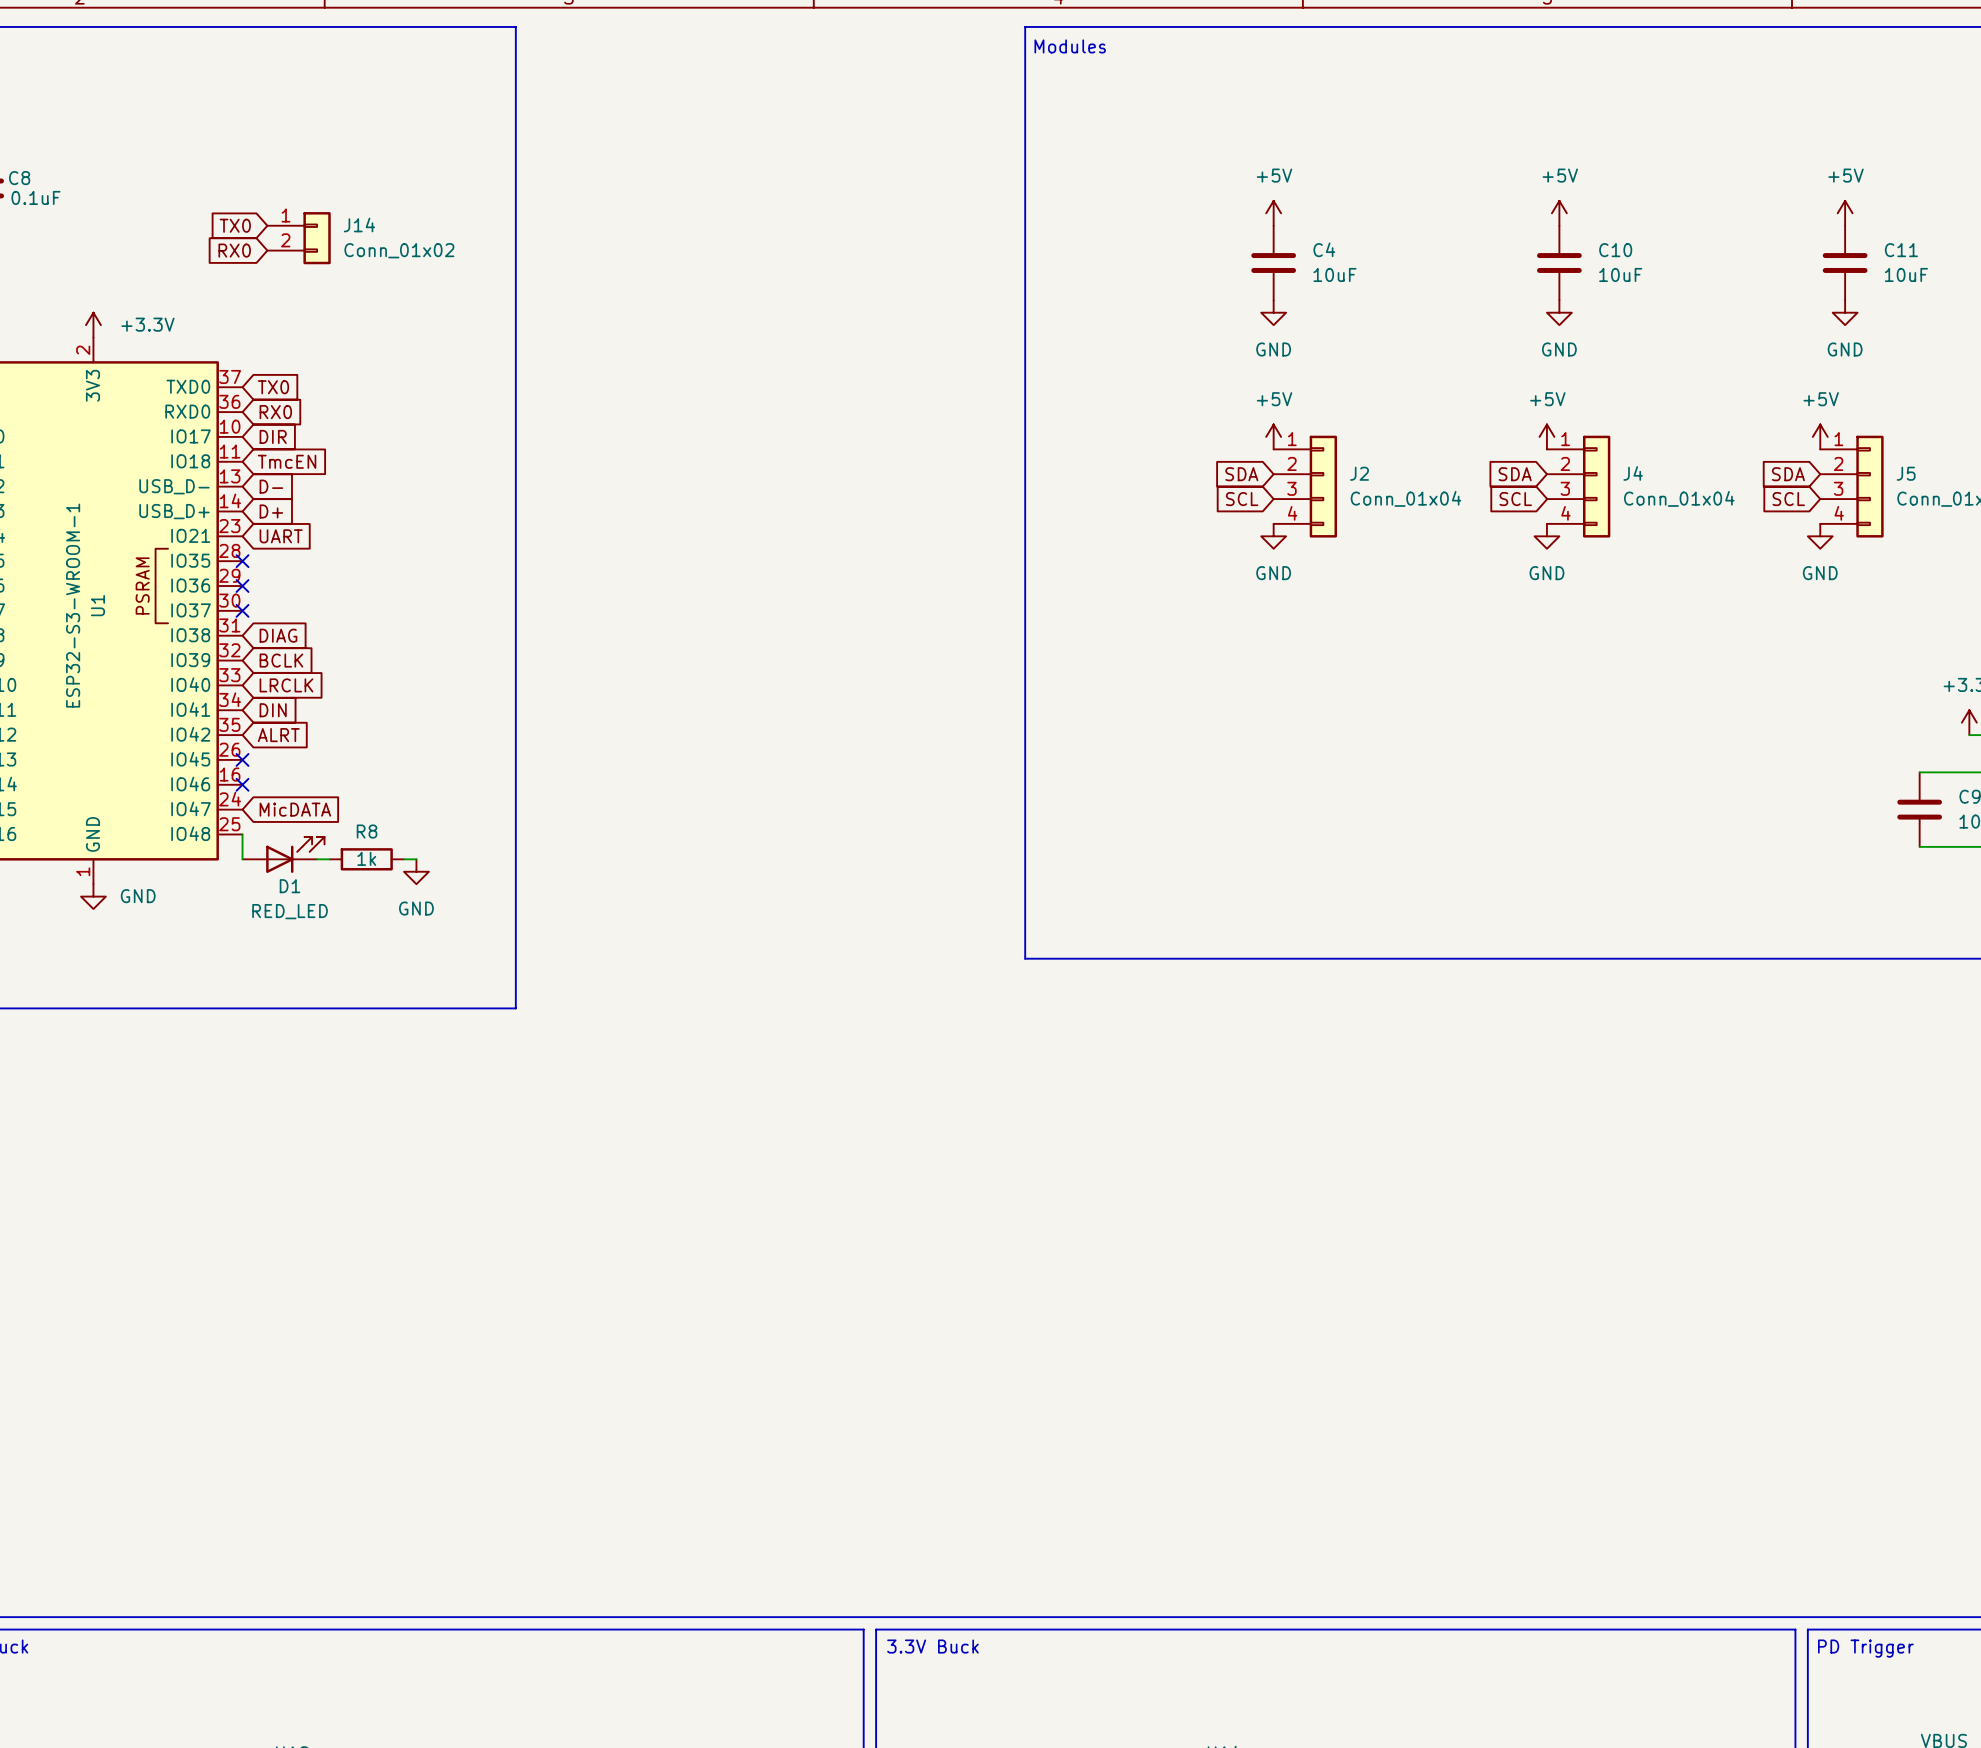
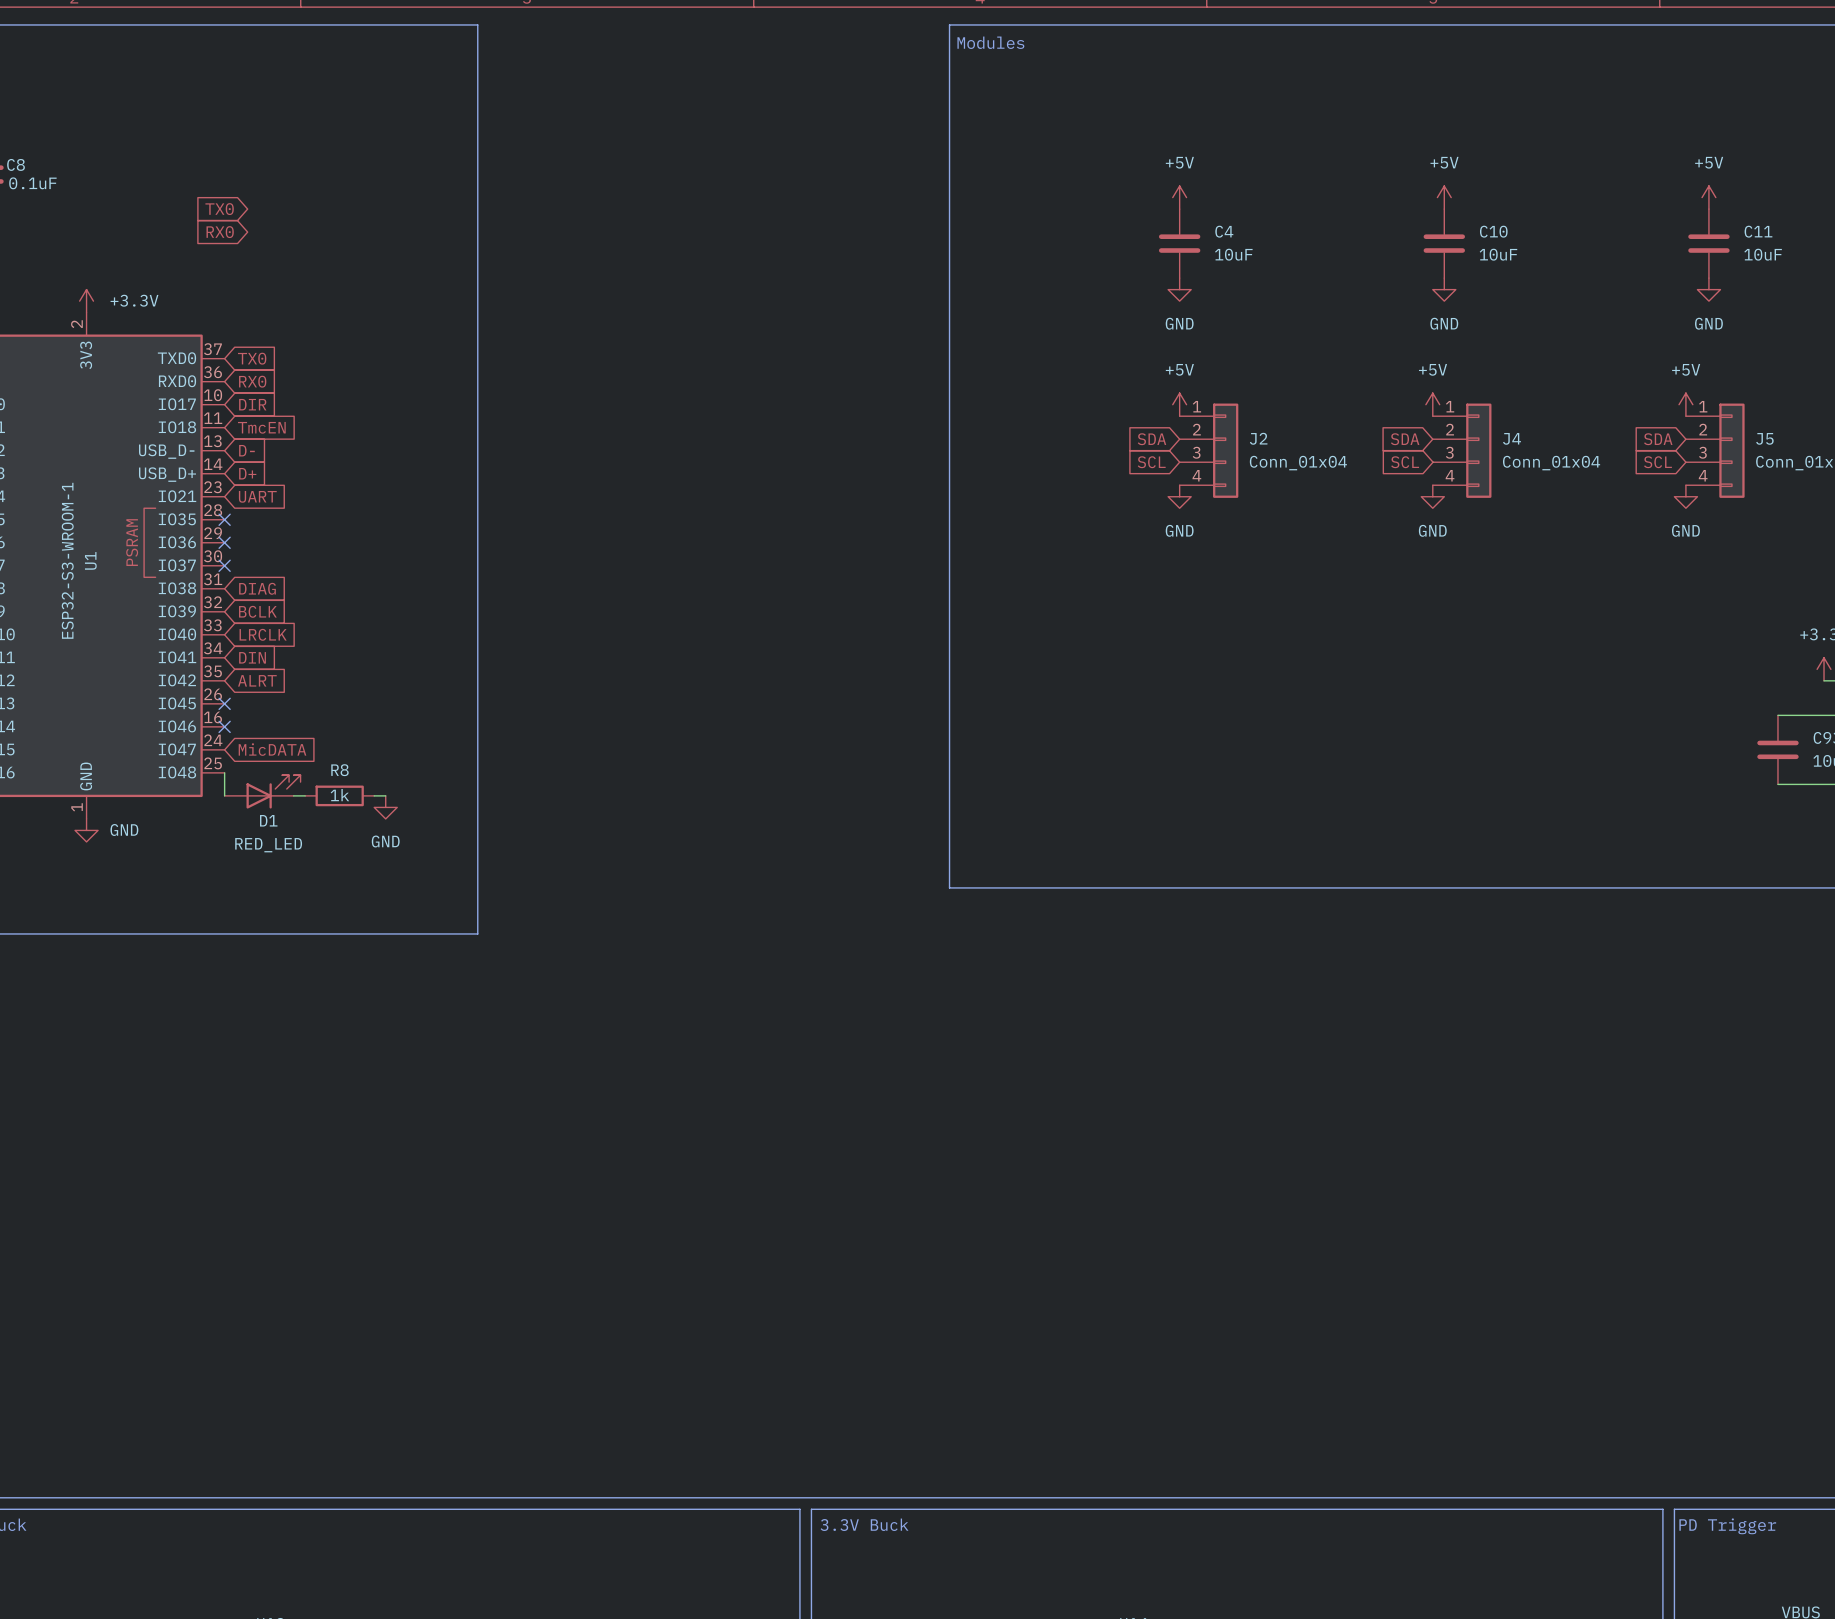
J14: Conn_01x02 (299, 238) -> none

